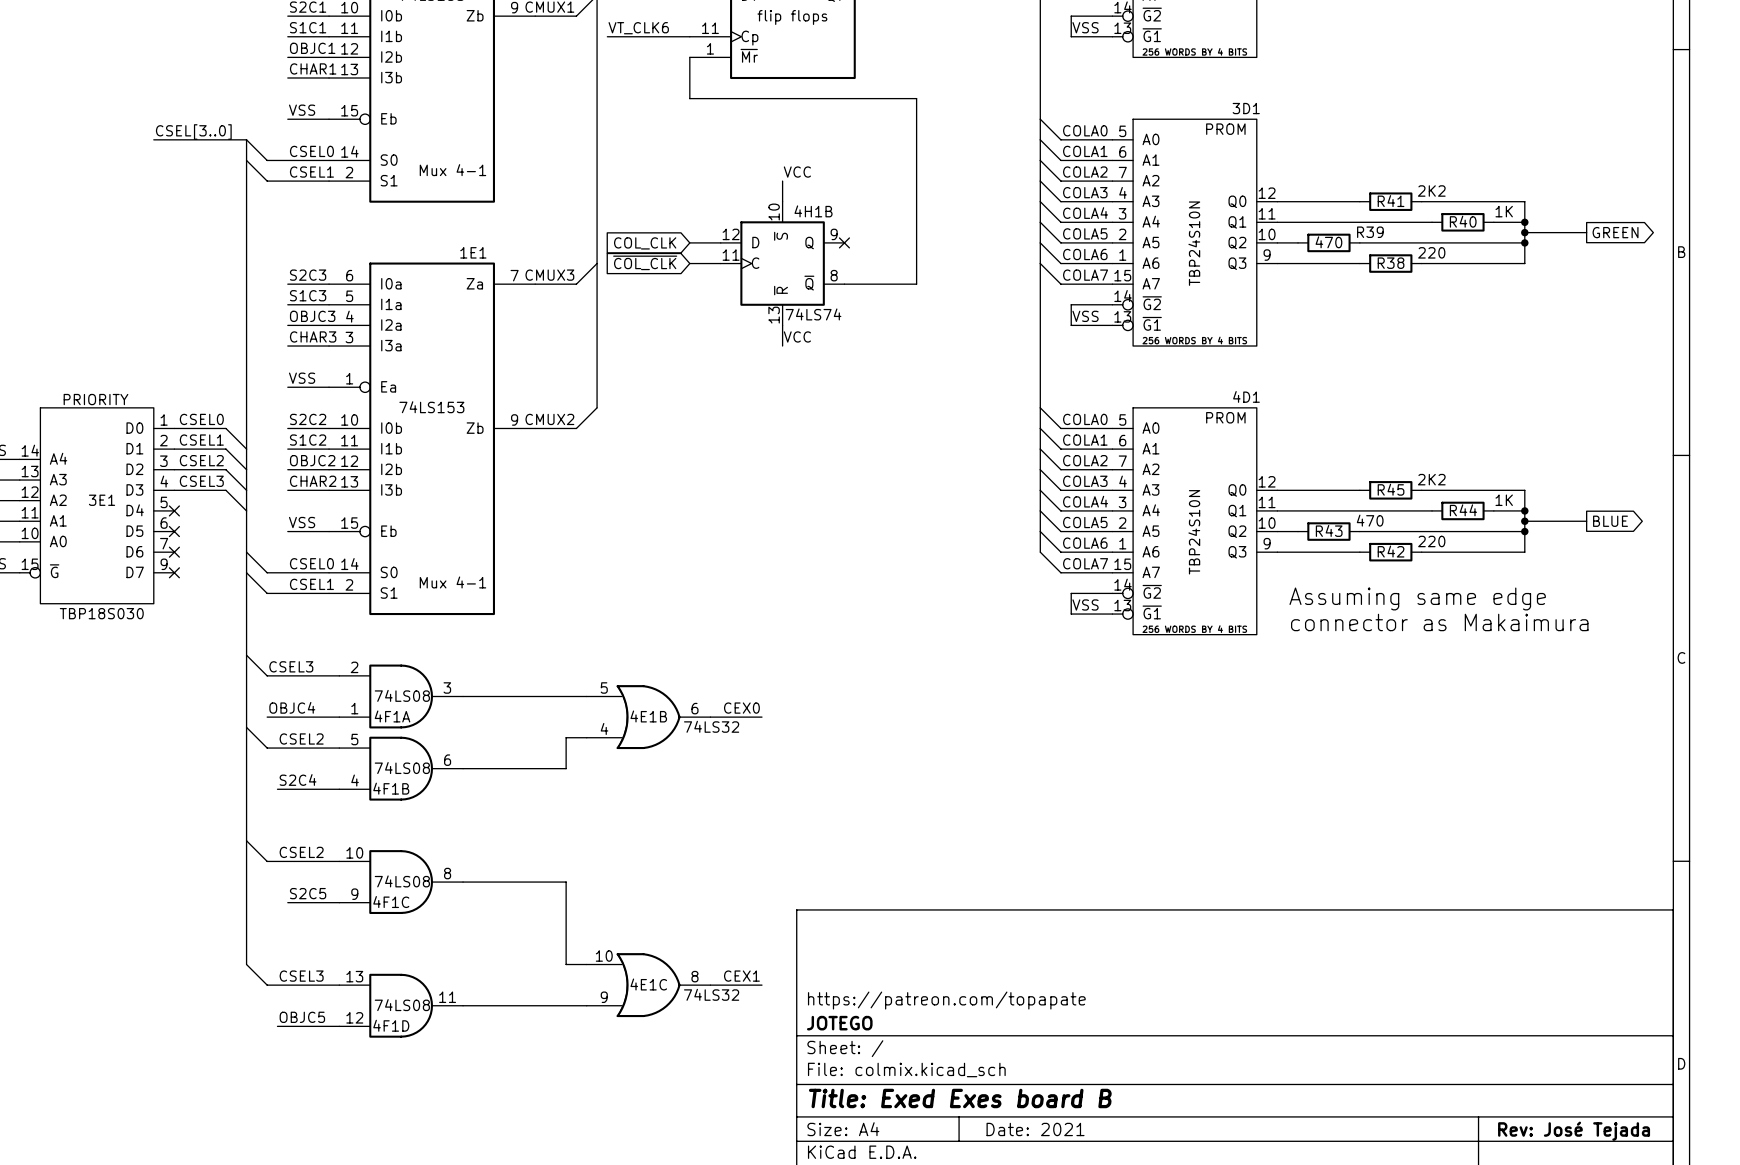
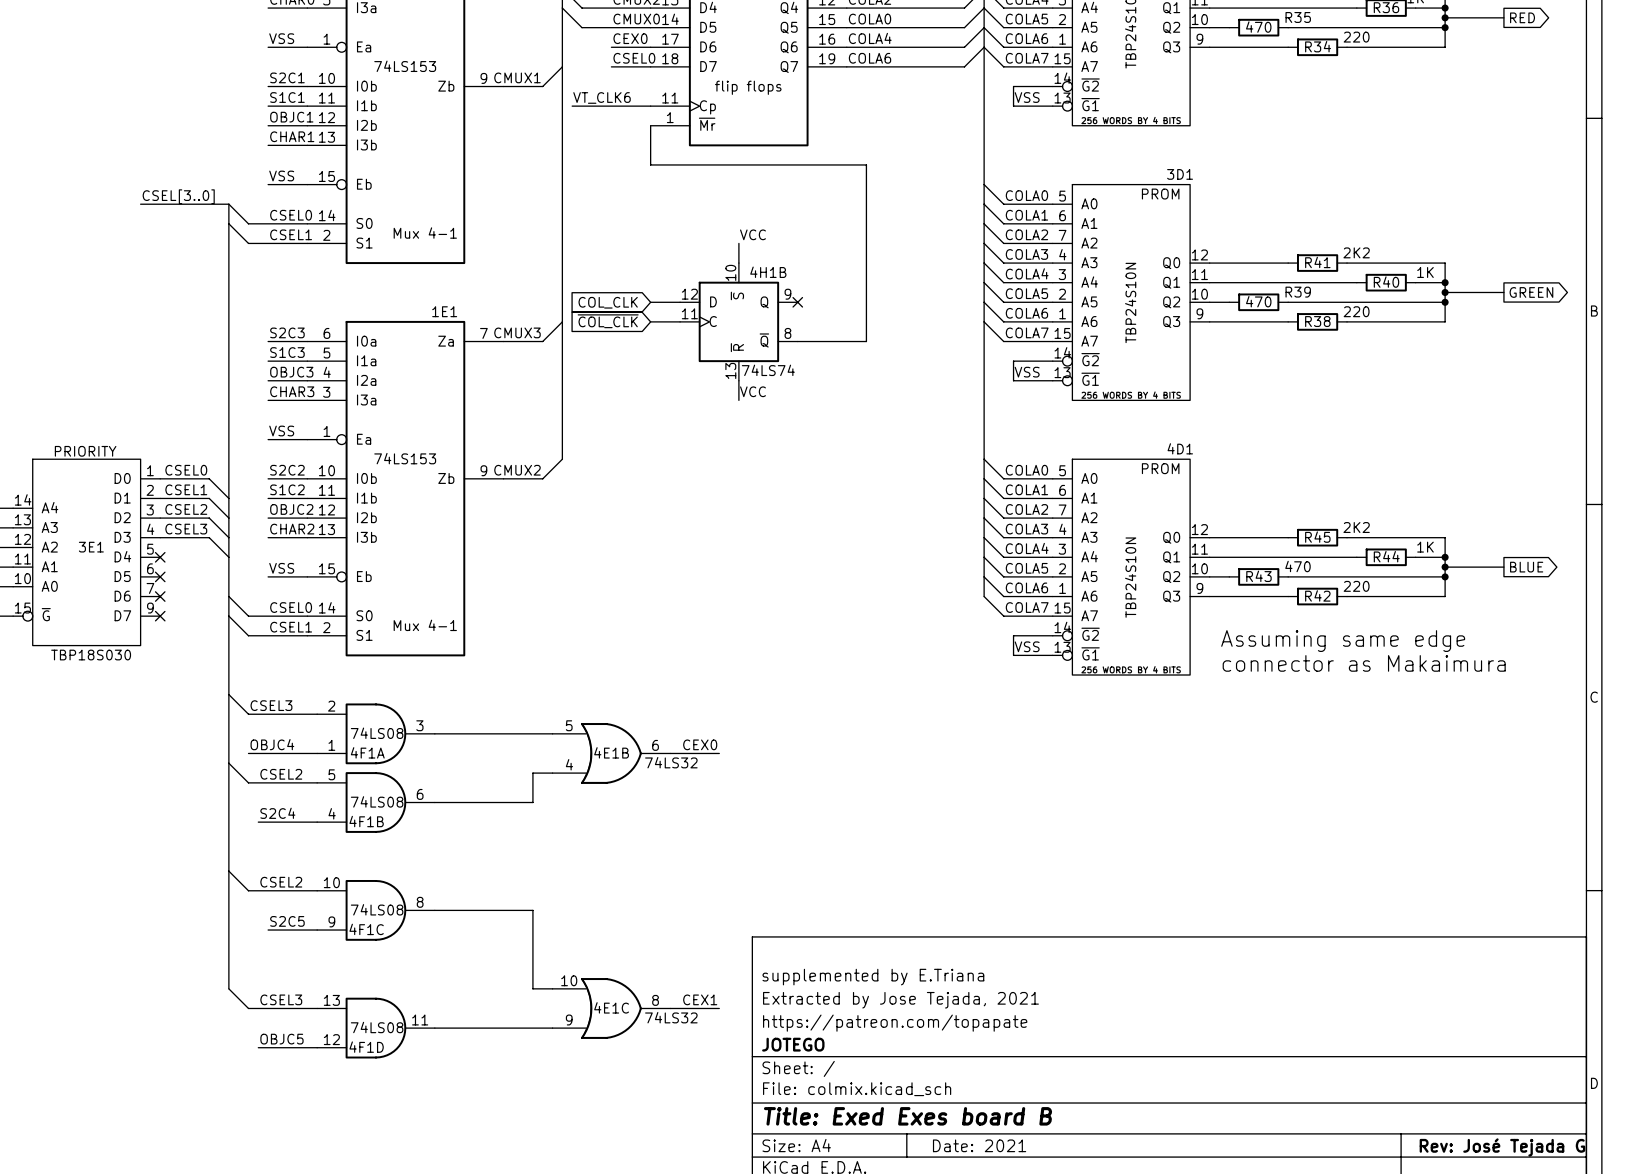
title block: none -> supplemented by E.Triana (873, 977)
title block: none -> Extracted by Jose Tejada, 2021 (900, 1000)
title block: Rev: José Tejada (1574, 1131) -> Rev: José Tejada G (1502, 1147)

